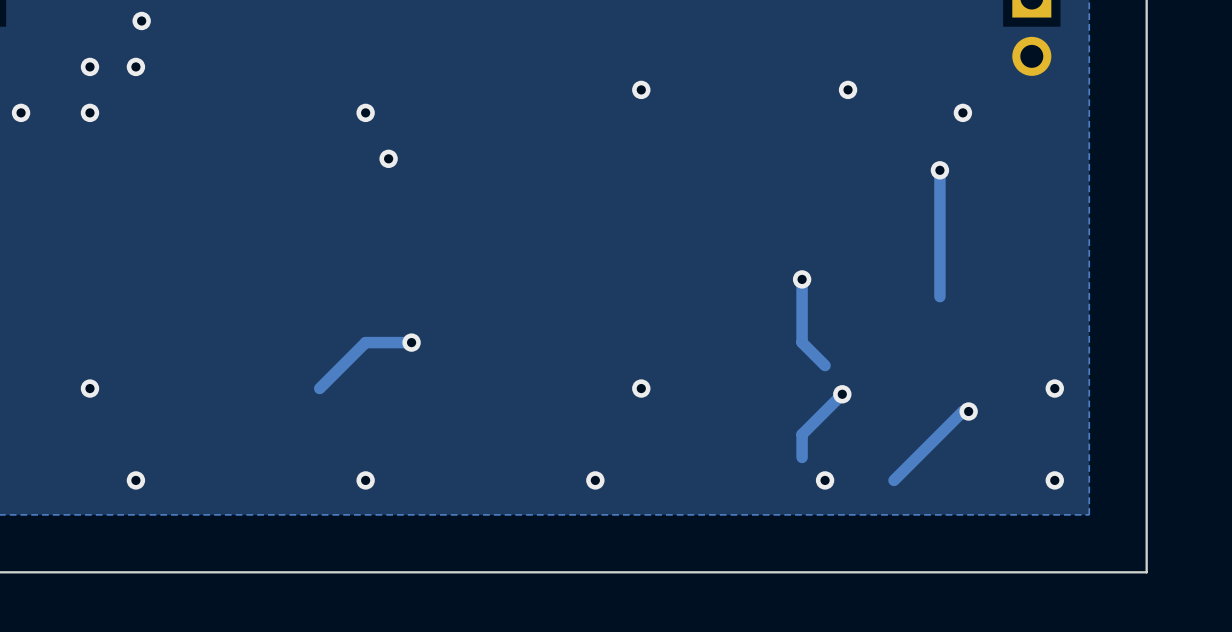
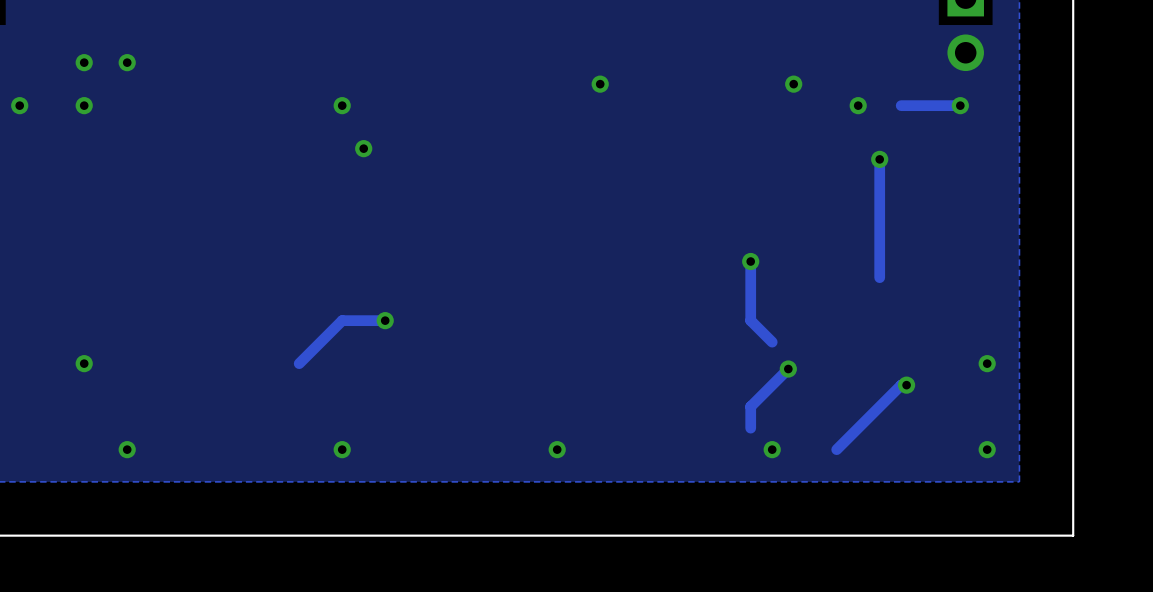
via: (141, 20) -> none
via: none -> (858, 105)
via: (962, 112) -> none
track: none -> (960, 105) (901, 105)
via: none -> (960, 105)
via: (641, 388) -> none

